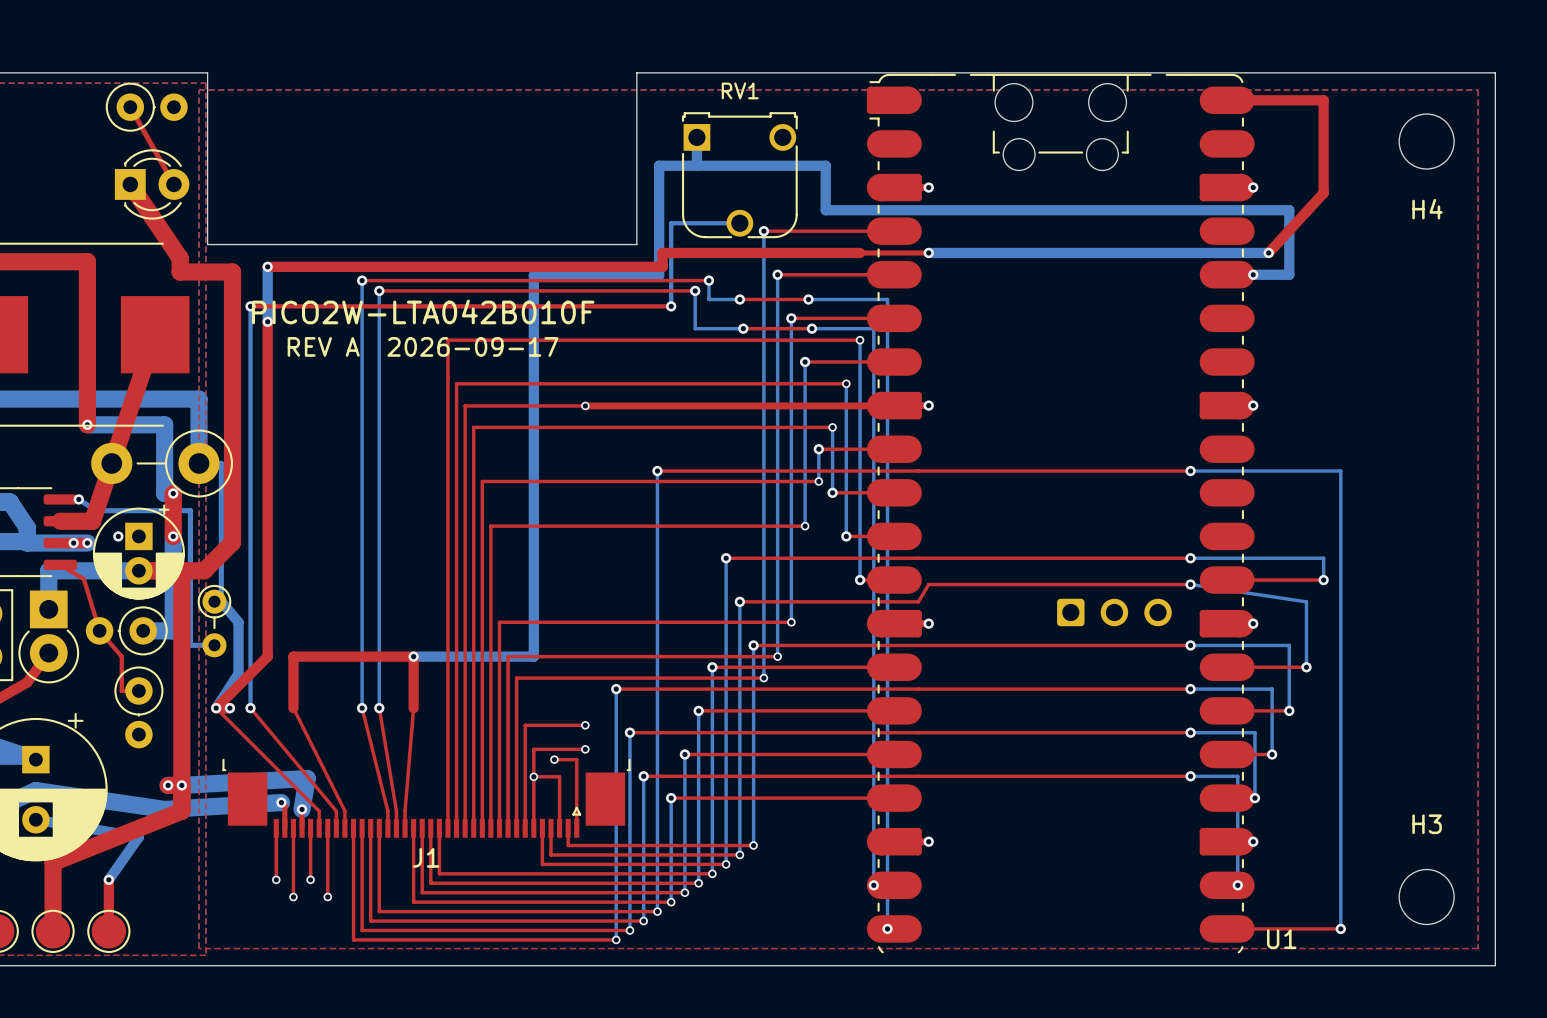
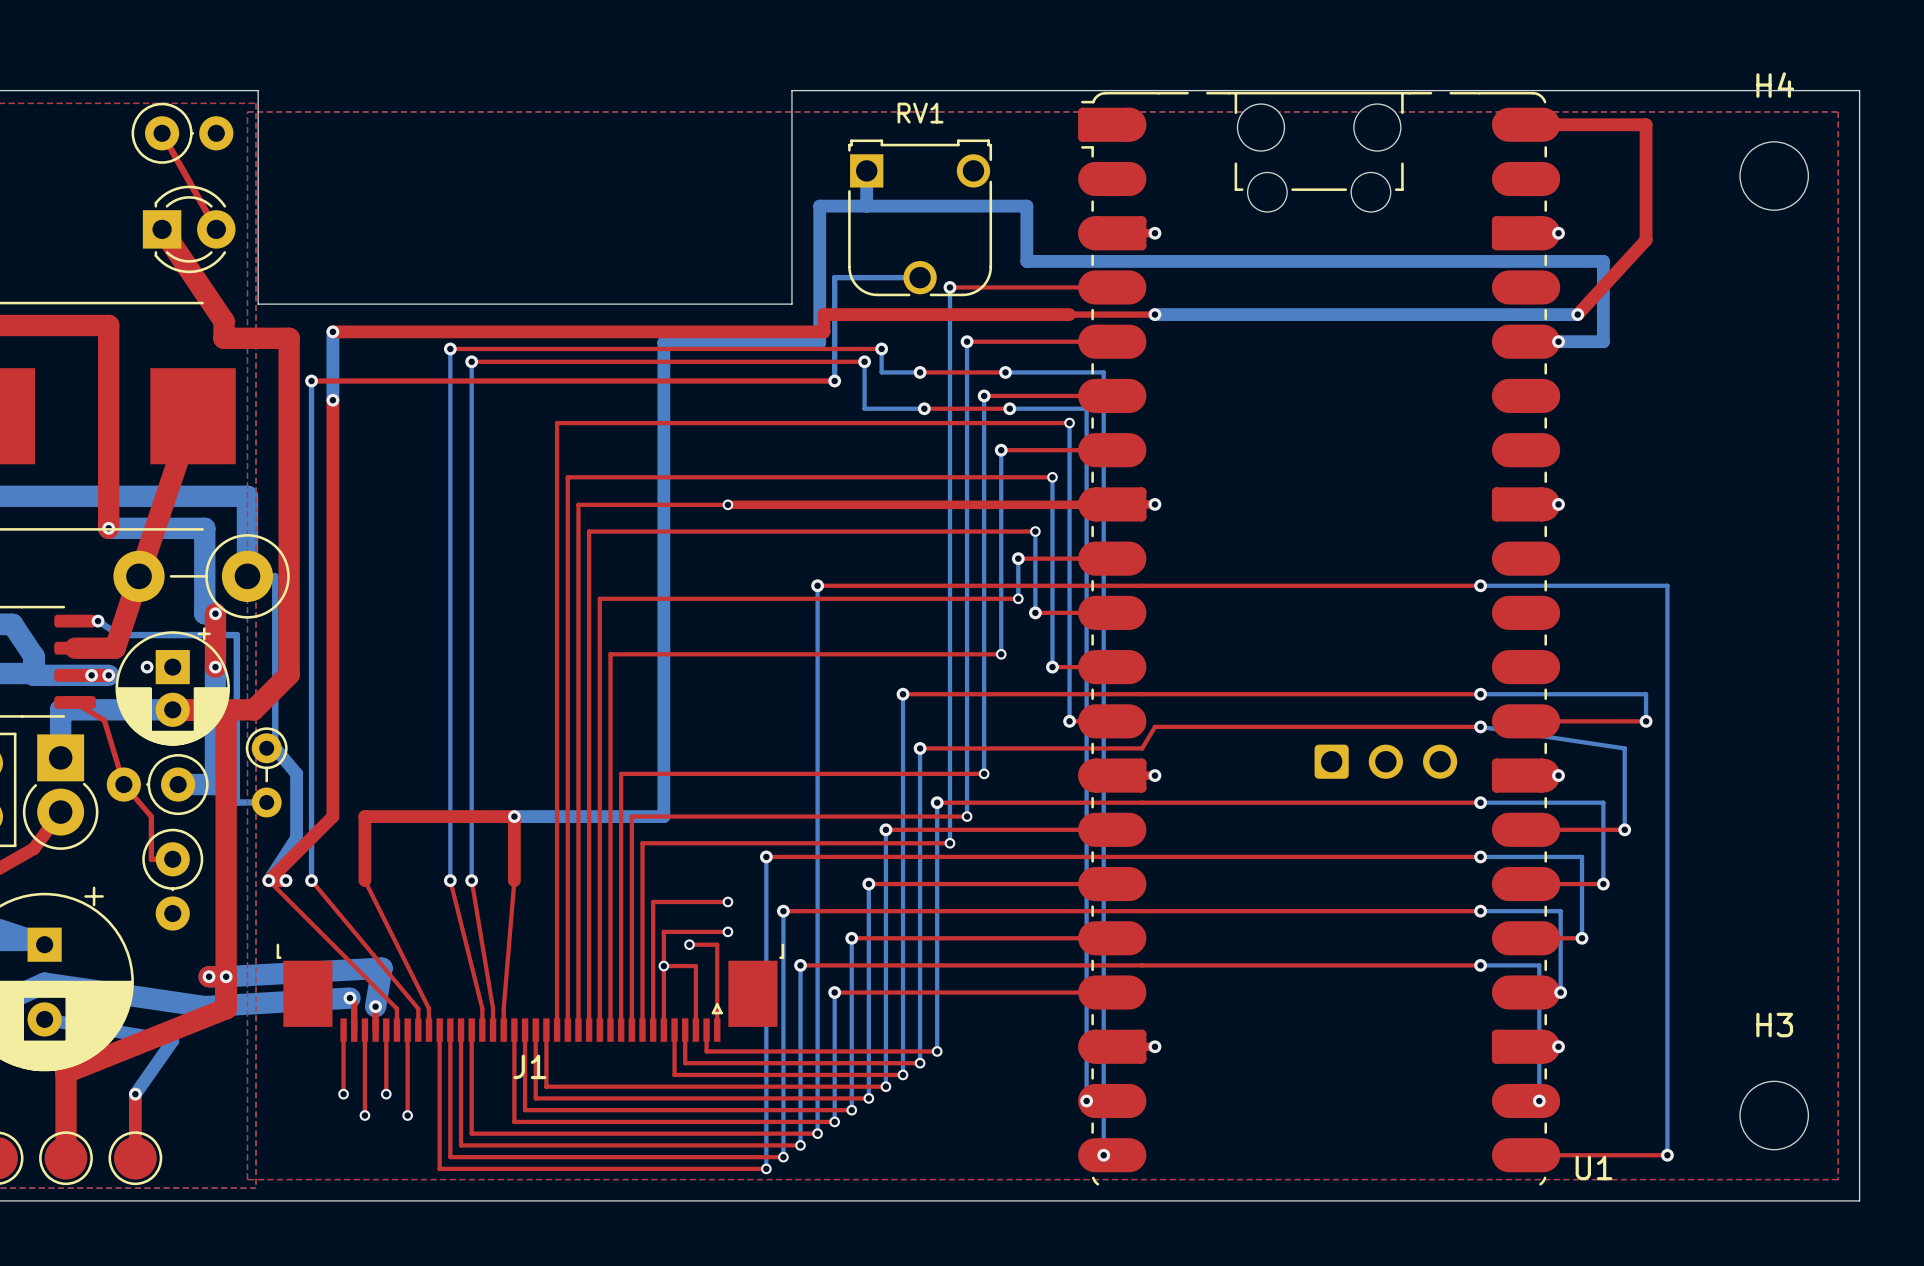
H4 name position: H4 (1427, 209) -> H4 (1775, 85)
text: PICO2W-LTA042B010F (423, 311) -> none
text: REV A 2026-09-17 (423, 346) -> none

